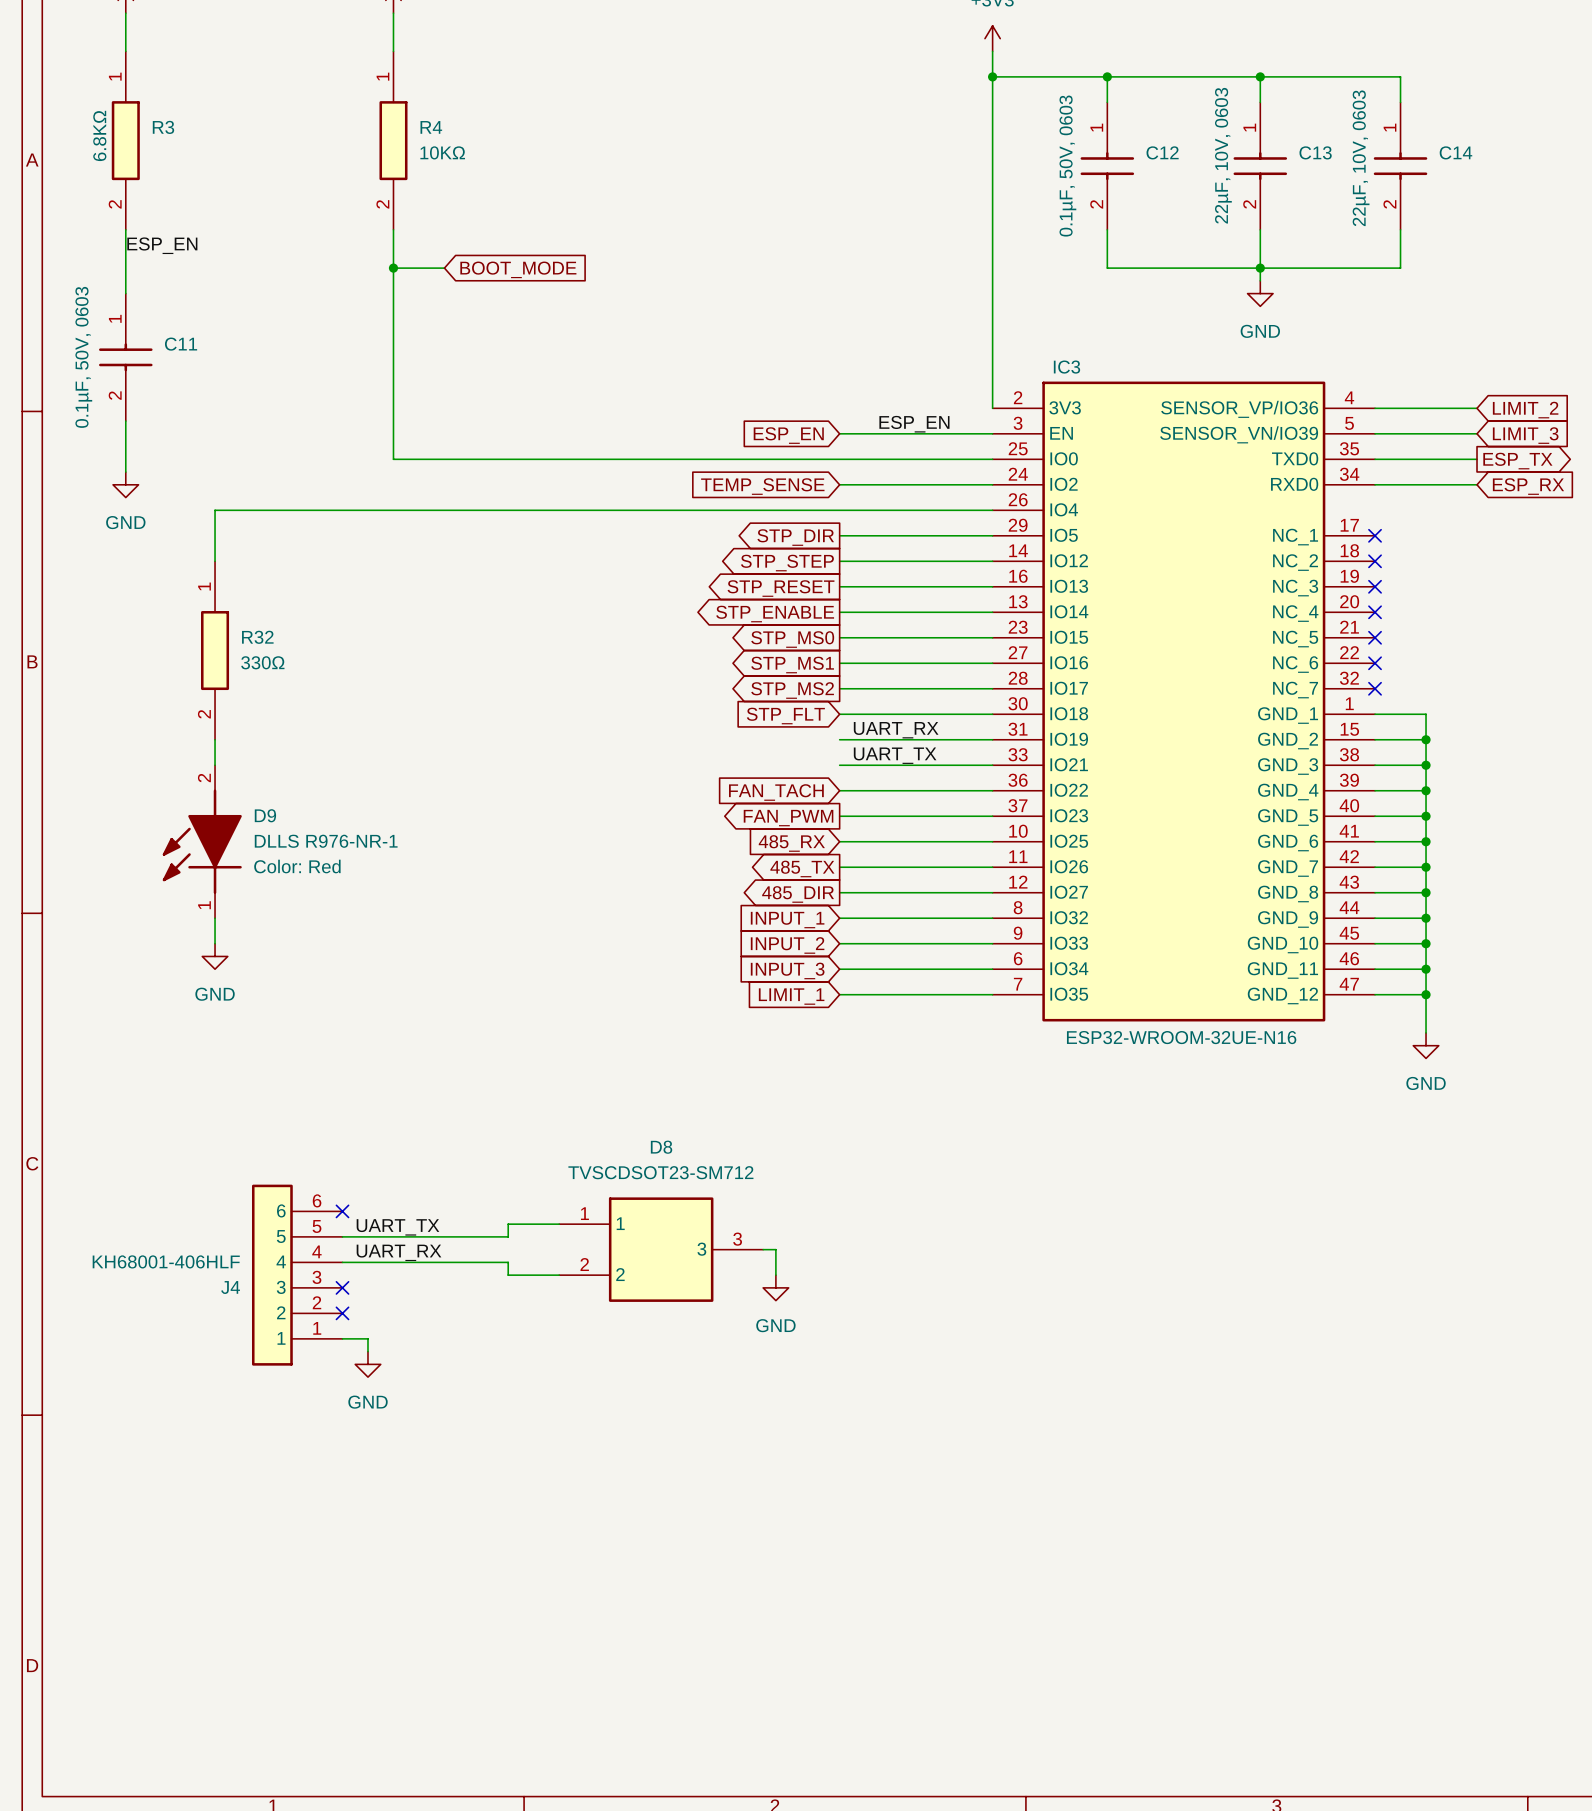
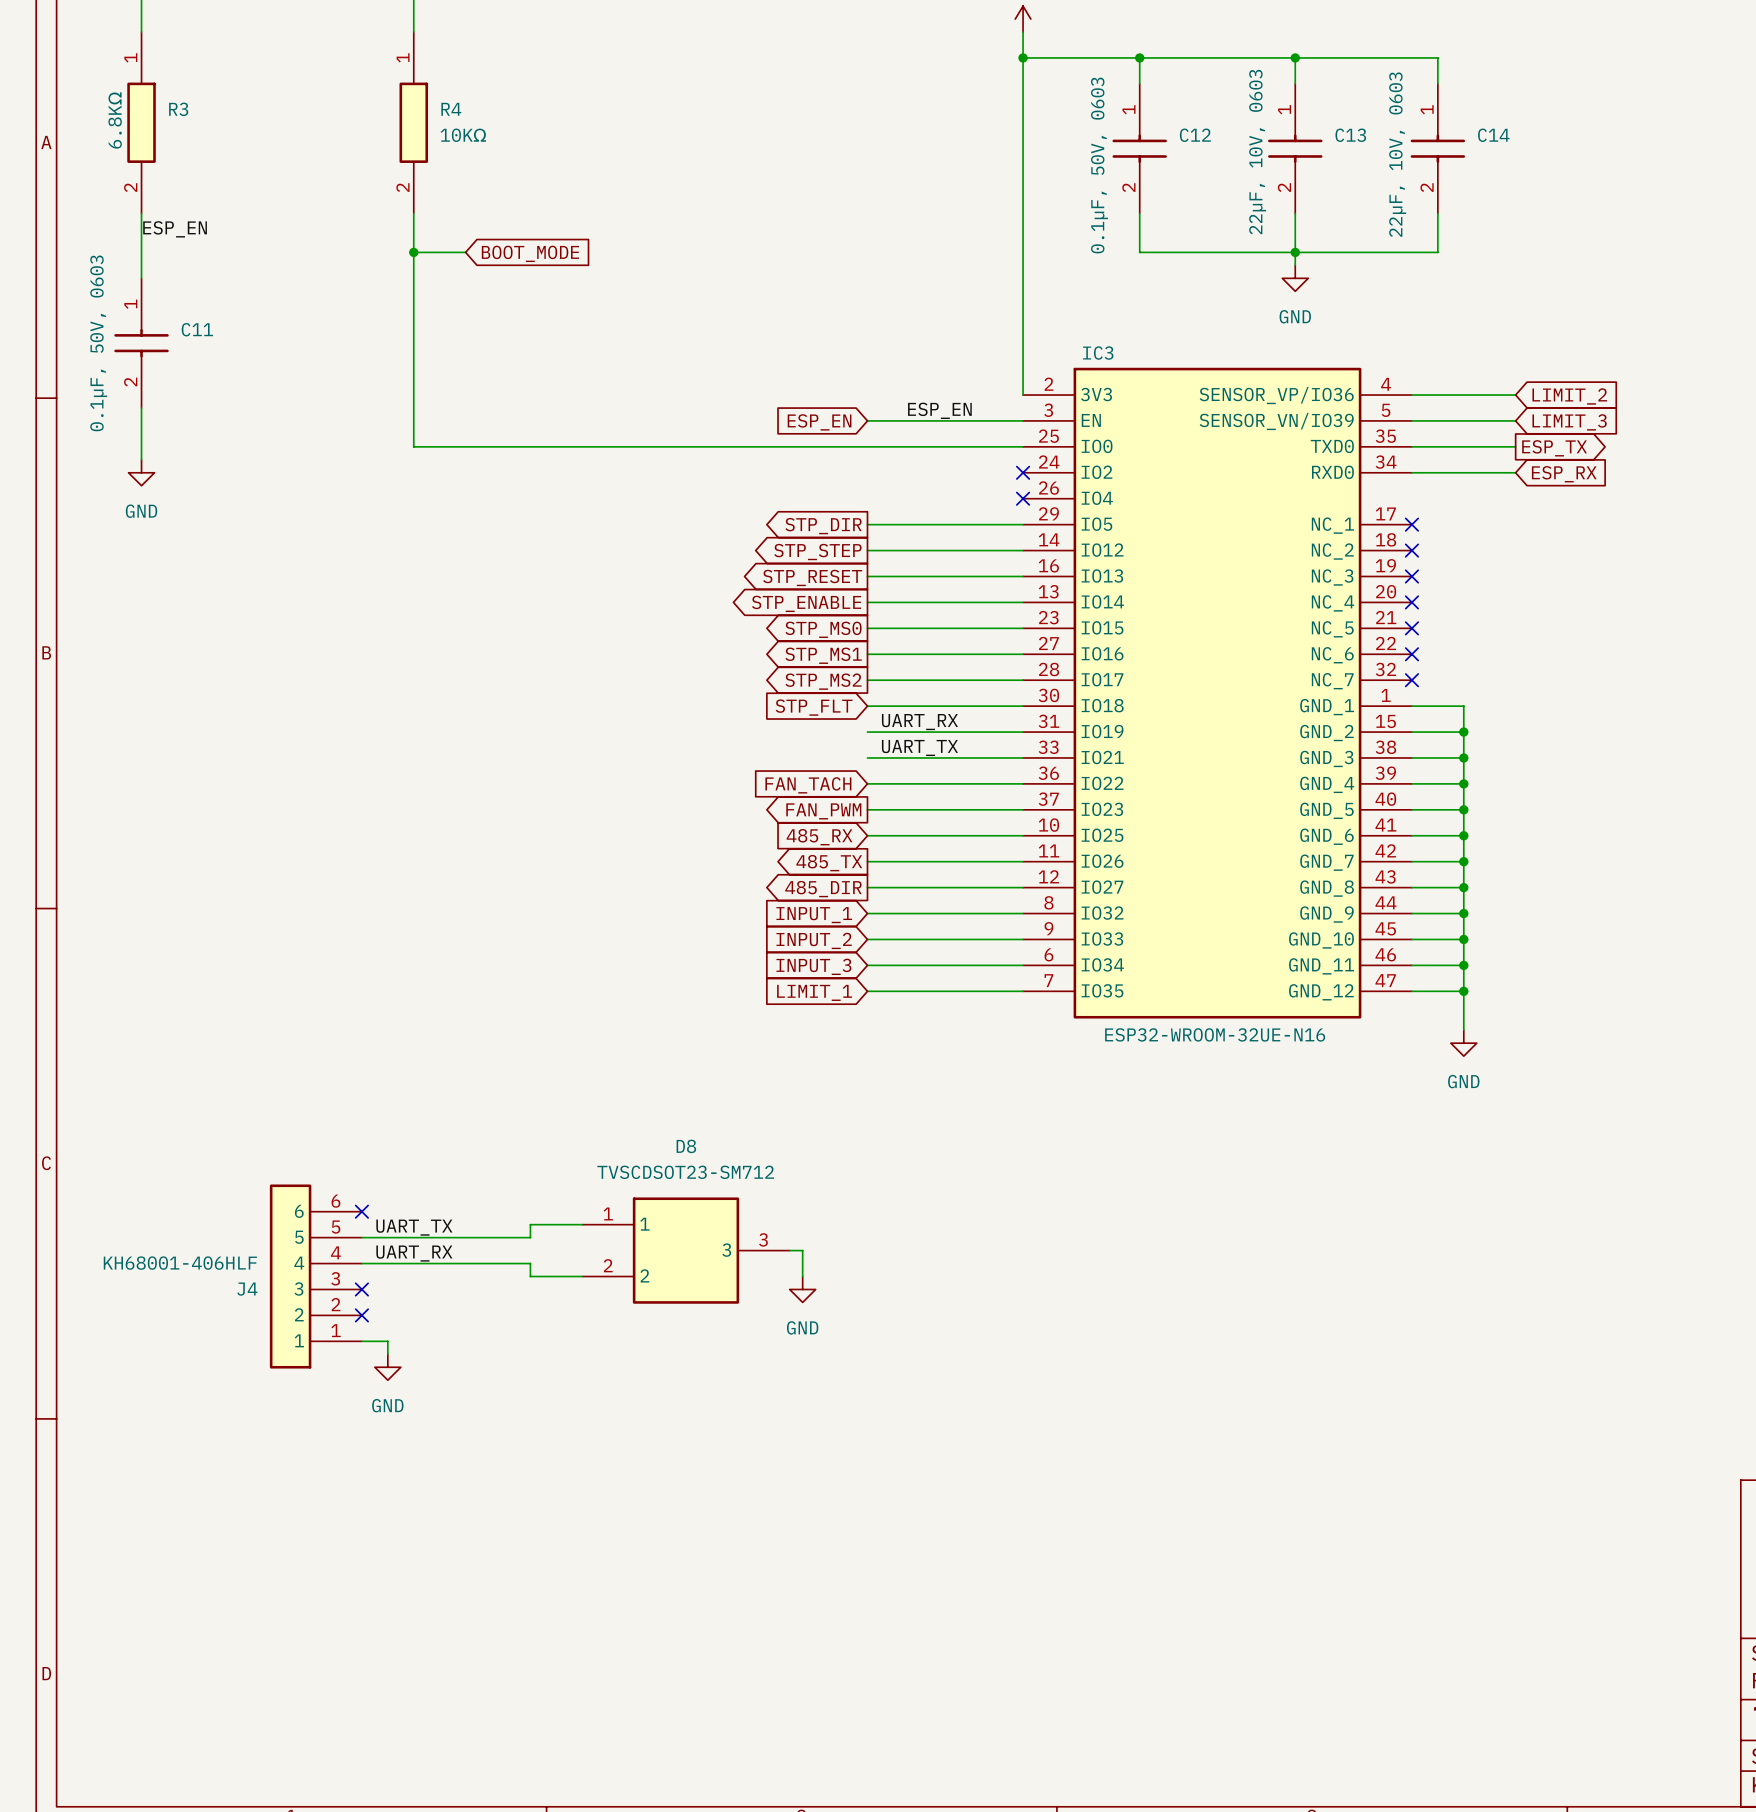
wire: (839, 484) (992, 484) -> none
no-connect mark: none -> (1023, 472)
global label: TEMP_SENSE (762, 486) -> none
wire: (992, 510) (215, 510) (215, 561) -> none
no-connect mark: none -> (1023, 498)
R32: (215, 650) -> none
wire: (215, 739) (215, 765) -> none
D9: DLLS R976-NR-1 (202, 841) -> none
wire: (215, 918) (215, 943) -> none
power symbol: GND (215, 956) -> none

